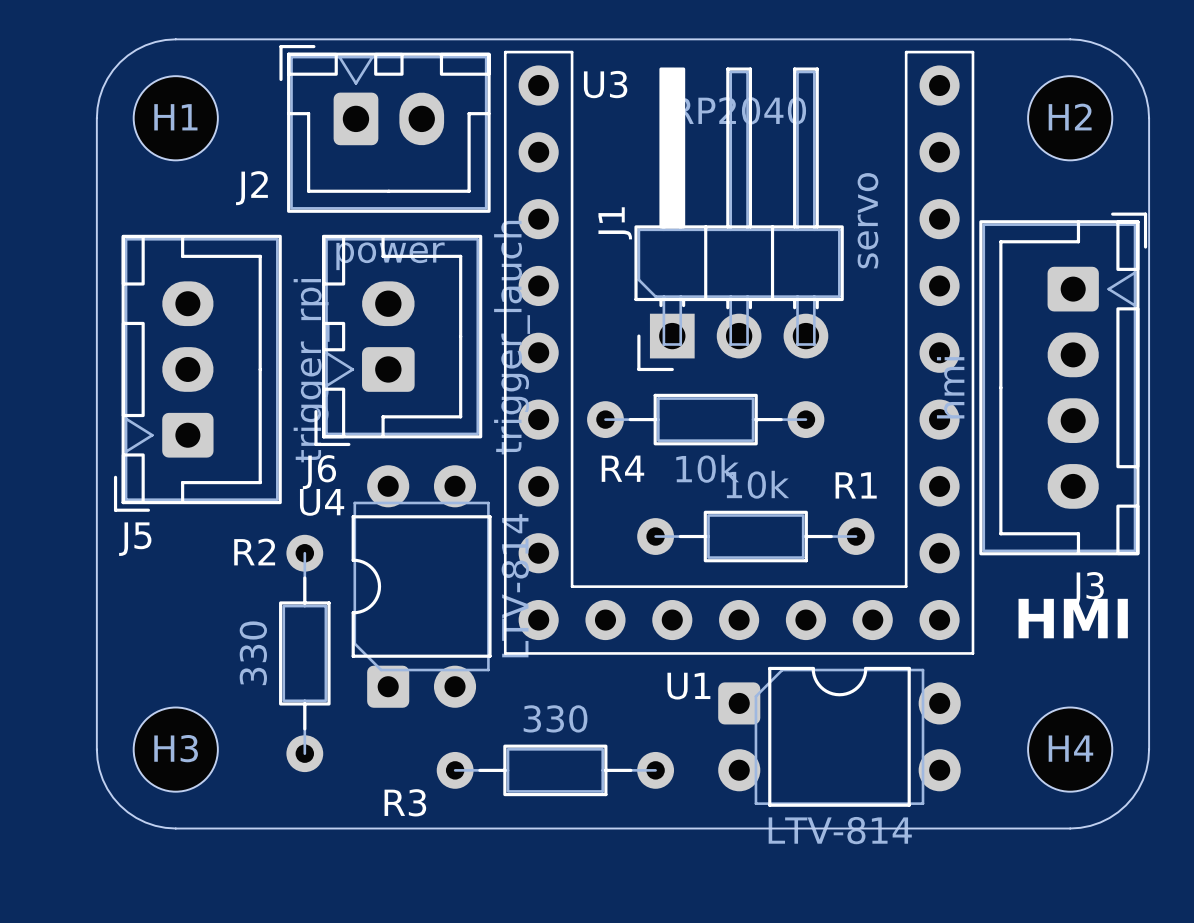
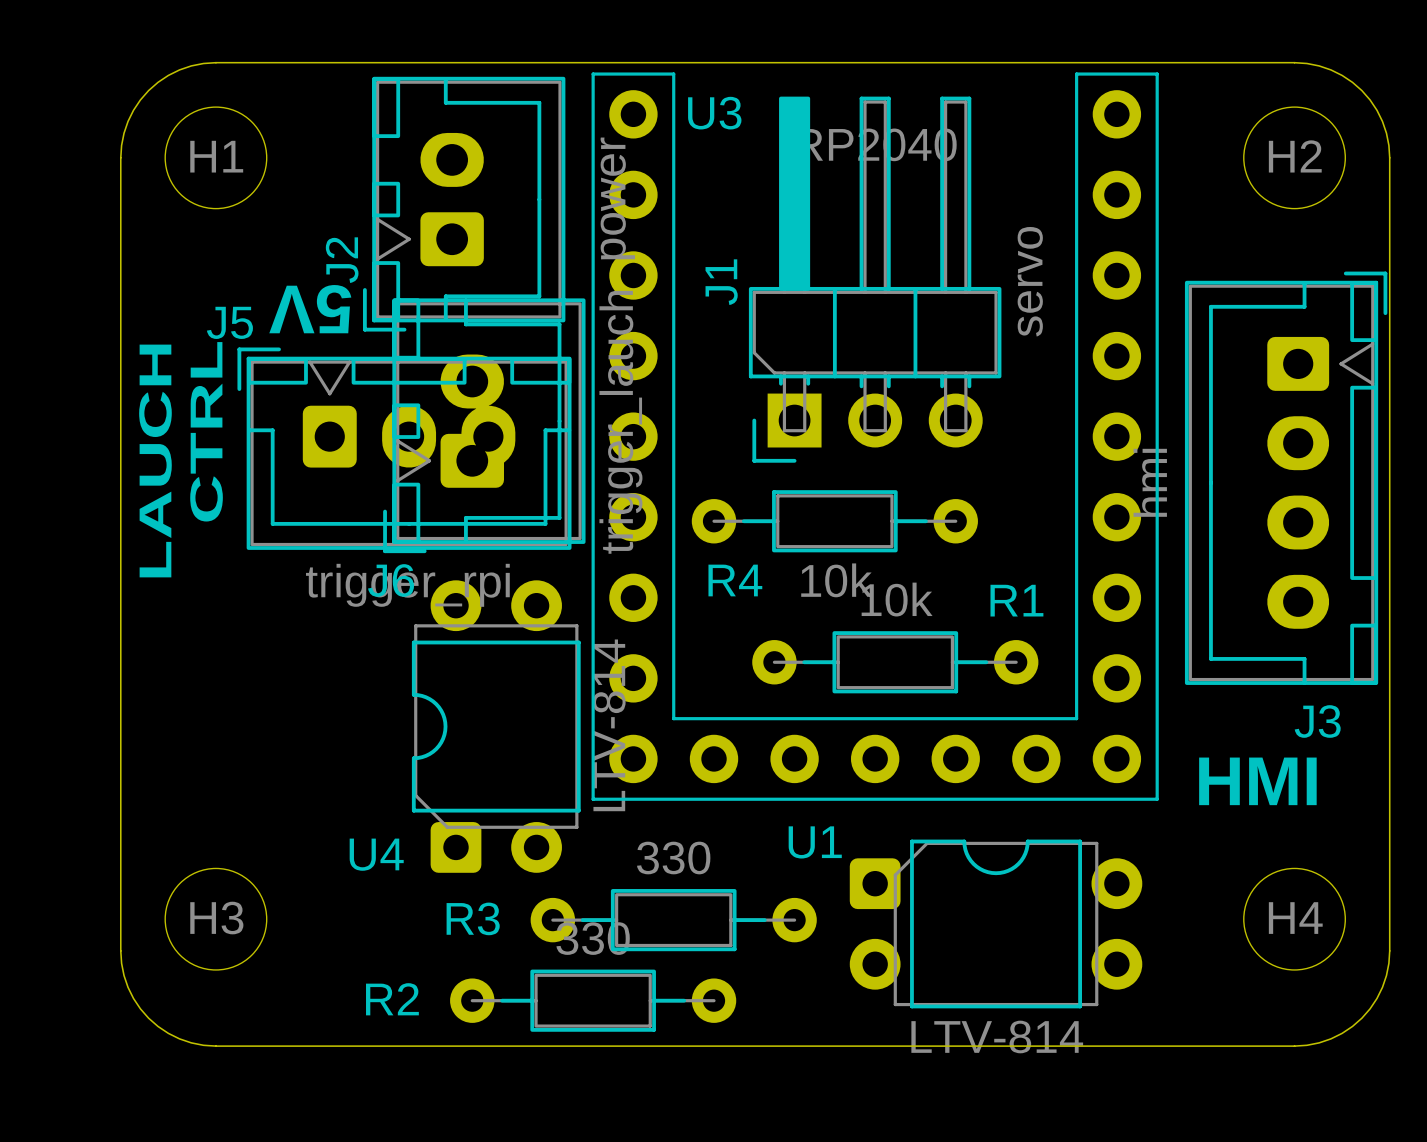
J2 rotation: 0° (385, 128) -> 90° counterclockwise (464, 204)
J1 position: (739, 219) -> (875, 279)
text: none -> 5V (310, 309)
text: none -> CTRL (206, 431)
U3 position: (739, 352) -> (875, 436)
text: none -> LAUCH (155, 460)
J5 rotation: 0° (197, 373) -> 90° clockwise (404, 448)
R4 position: (705, 419) -> (834, 521)
U4 name position: U4 (322, 502) -> U4 (376, 854)
R1 position: (755, 536) -> (895, 662)
R2 name position: R2 (254, 552) -> R2 (392, 999)
U4 position: (421, 586) -> (496, 726)
text position: HMI (1073, 618) -> HMI (1257, 781)
R2 rotation: 0° (304, 653) -> 90° clockwise (593, 1000)
R2 position: (304, 653) -> (593, 1000)
U1 name position: U1 (688, 686) -> U1 (815, 842)
U1 position: (839, 736) -> (996, 923)
board edge: (96, 749) (102, 779) (119, 805) (145, 822) (175, 828) (1080, 827) (1100, 822) (1125, 805) (1143, 779) (1149, 749) -> (120, 919) (120, 950) (124, 975) (133, 998) (140, 1008) (158, 1026) (168, 1033) (191, 1042) (215, 1046) (1306, 1045) (1319, 1042) (1342, 1033) (1361, 1018) (1376, 998) (1386, 975) (1388, 963) (1389, 919)
R3 position: (555, 770) -> (673, 920)
R3 name position: R3 (405, 802) -> R3 (473, 918)

